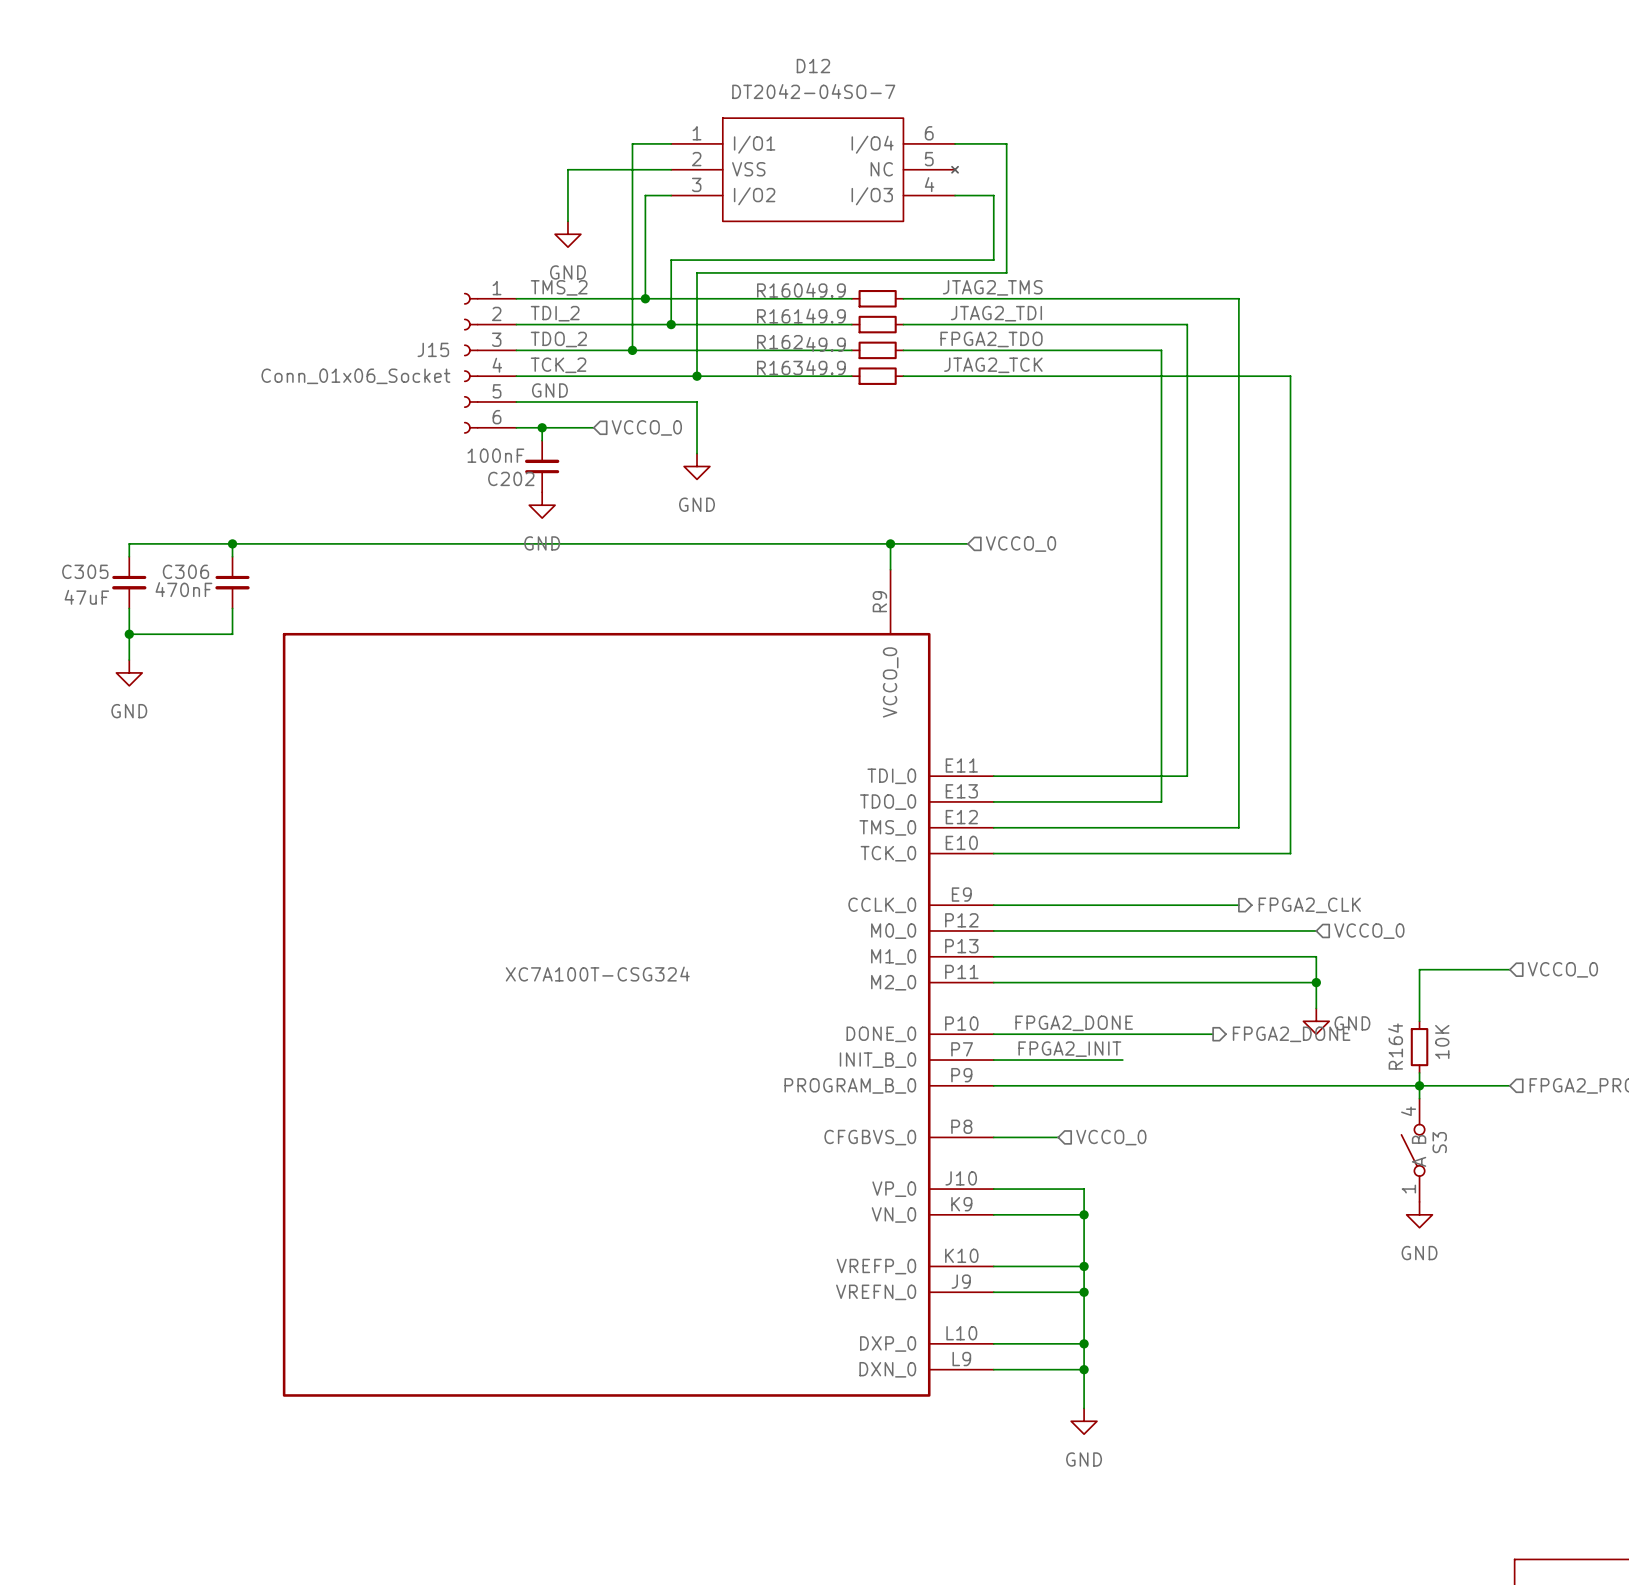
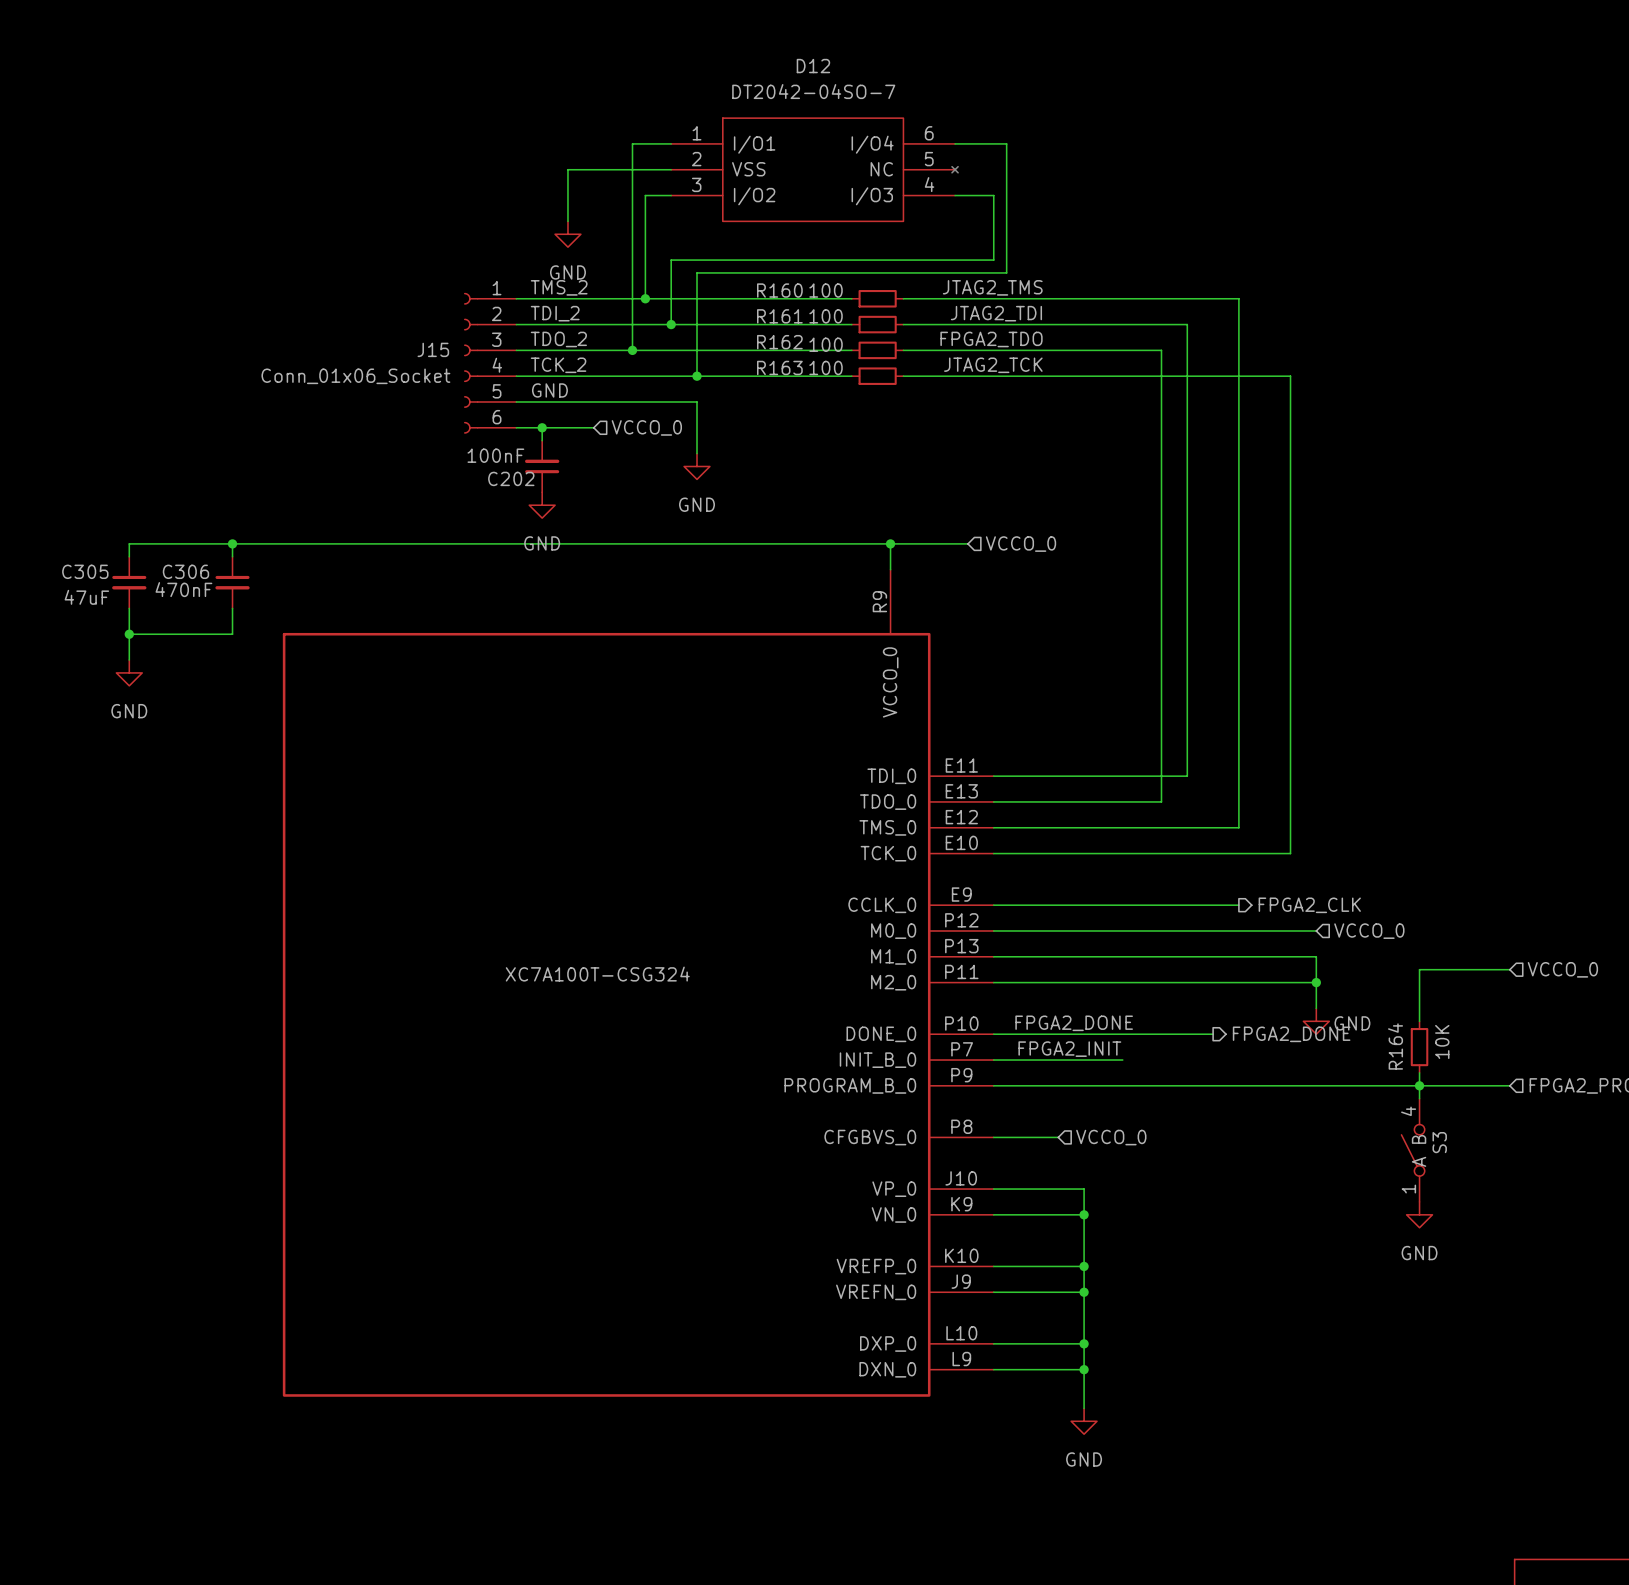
R160 value: 49.9 (826, 290) -> 100 (826, 290)
R161 value: 49.9 (826, 316) -> 100 (826, 316)
R162 value: 49.9 (826, 344) -> 100 (826, 344)
R163 value: 49.9 (826, 367) -> 100 (826, 367)

